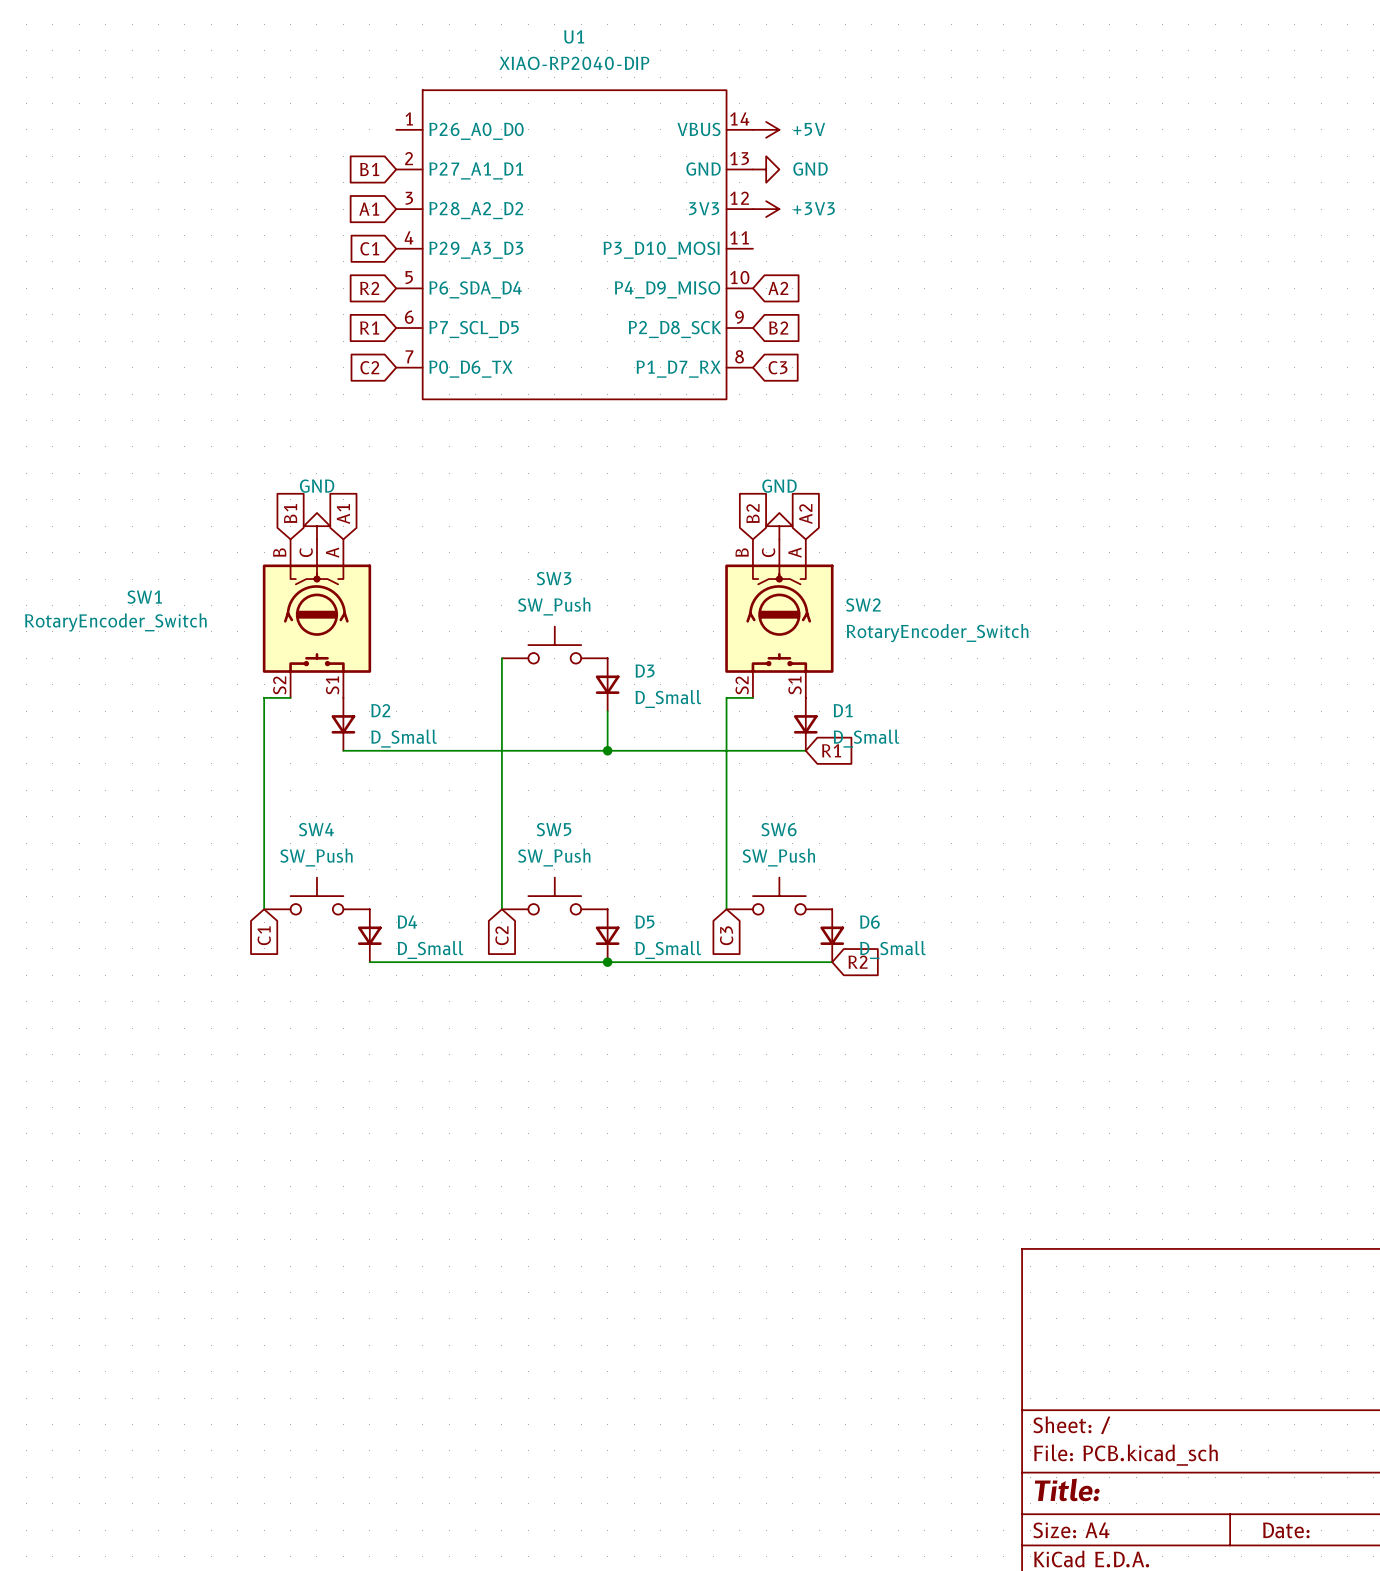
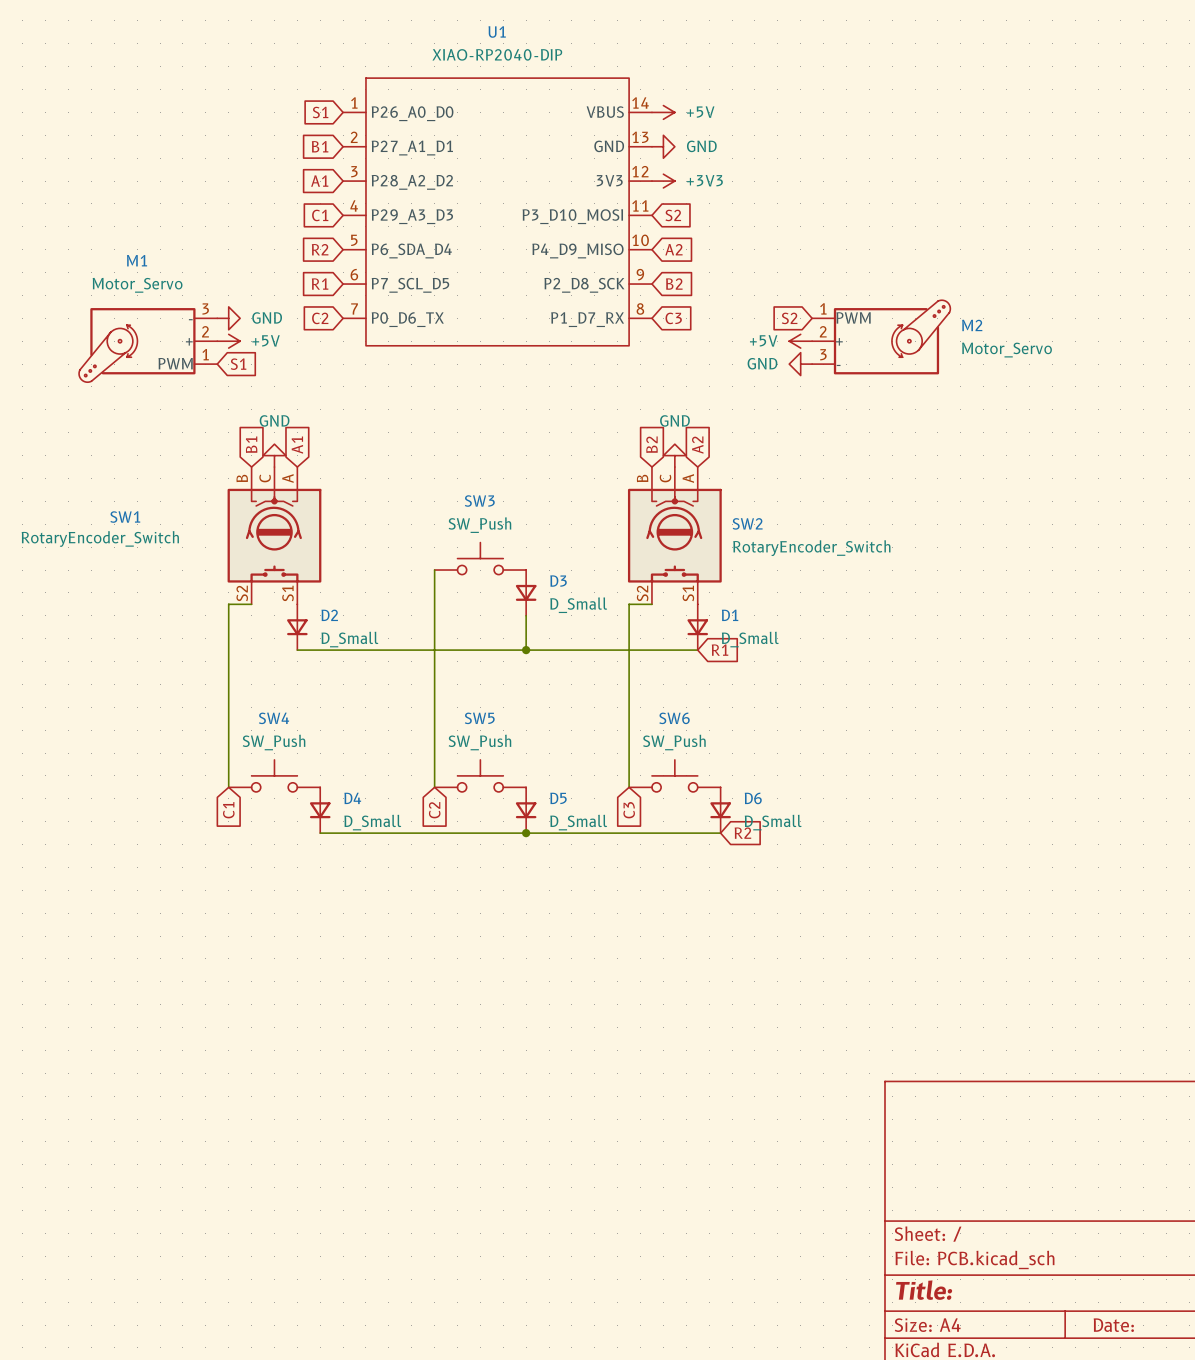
global label: none -> S1 (320, 112)
global label: none -> S2 (673, 215)
power symbol: none -> GND (228, 318)
global label: none -> S2 (789, 318)
M2: none -> Motor_Servo (881, 337)
power symbol: none -> +5V (228, 341)
power symbol: none -> +5V (800, 341)
M1: none -> Motor_Servo (148, 345)
global label: none -> S1 (238, 364)
power symbol: none -> GND (800, 364)

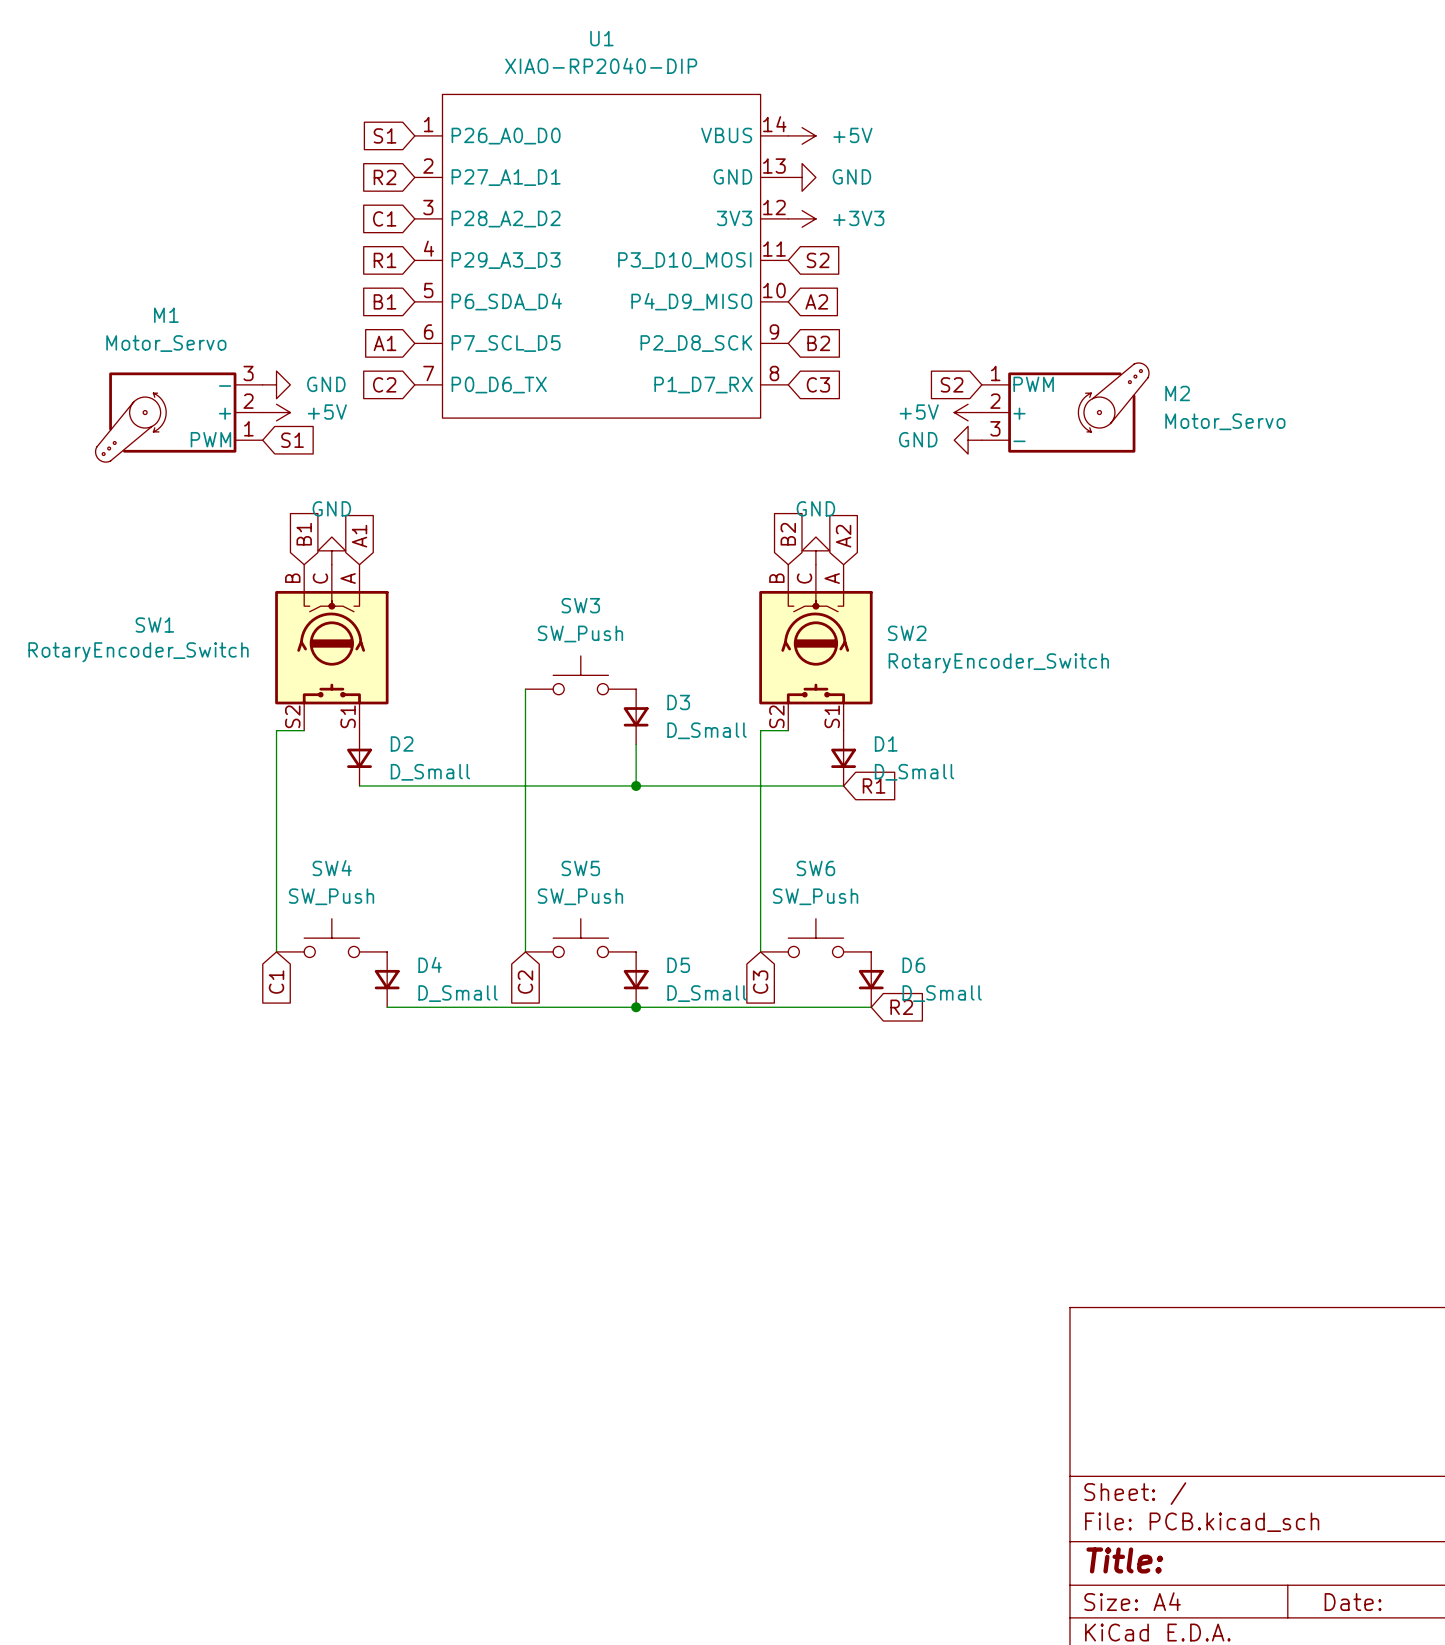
global label: B1 (320, 146) -> R2 (385, 177)
global label: A1 (319, 181) -> C1 (384, 218)
global label: C1 (320, 215) -> R1 (385, 260)
global label: R2 (320, 249) -> B1 (385, 301)
global label: R1 (320, 284) -> A1 (385, 343)

